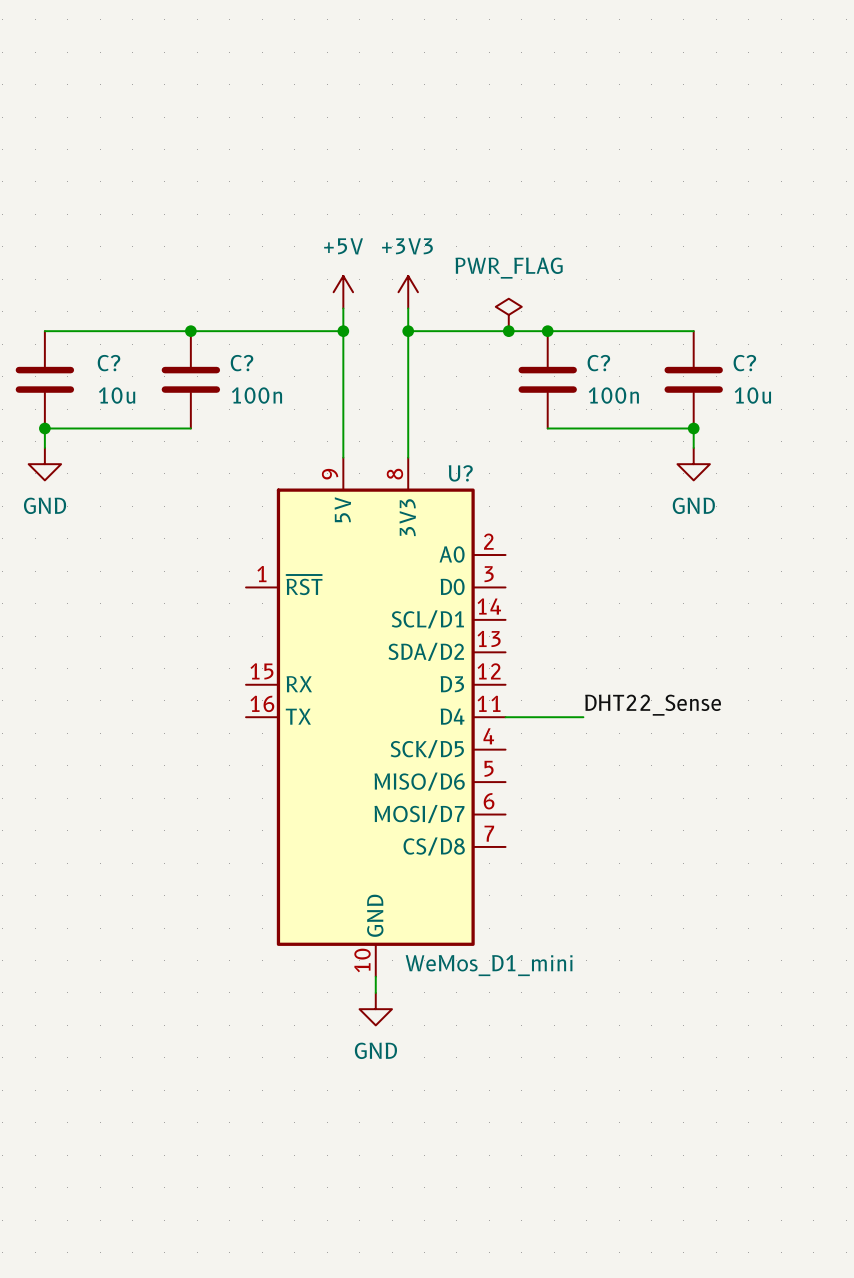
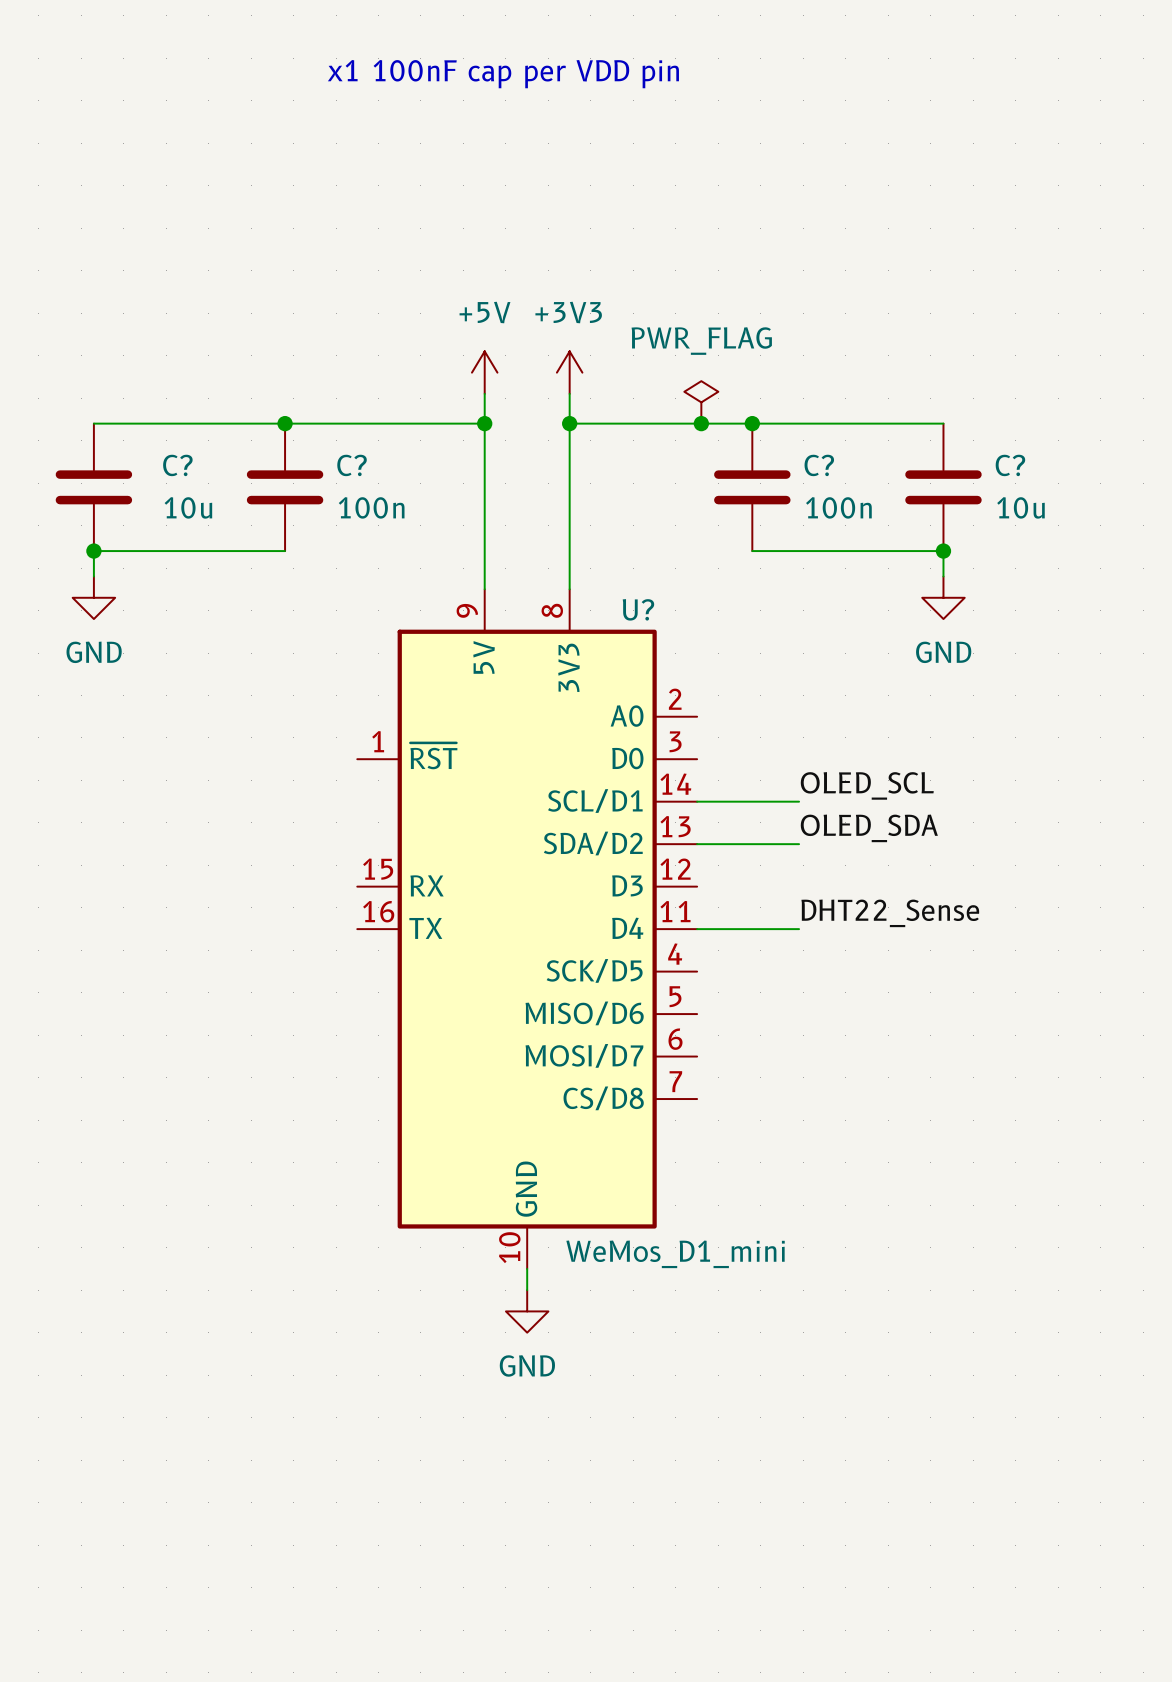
text: none -> x1 100nF cap per VDD pin (503, 74)
label: none -> OLED_SCL (867, 785)
wire: none -> (697, 801) (799, 801)
label: none -> OLED_SDA (869, 828)
wire: none -> (697, 844) (799, 844)

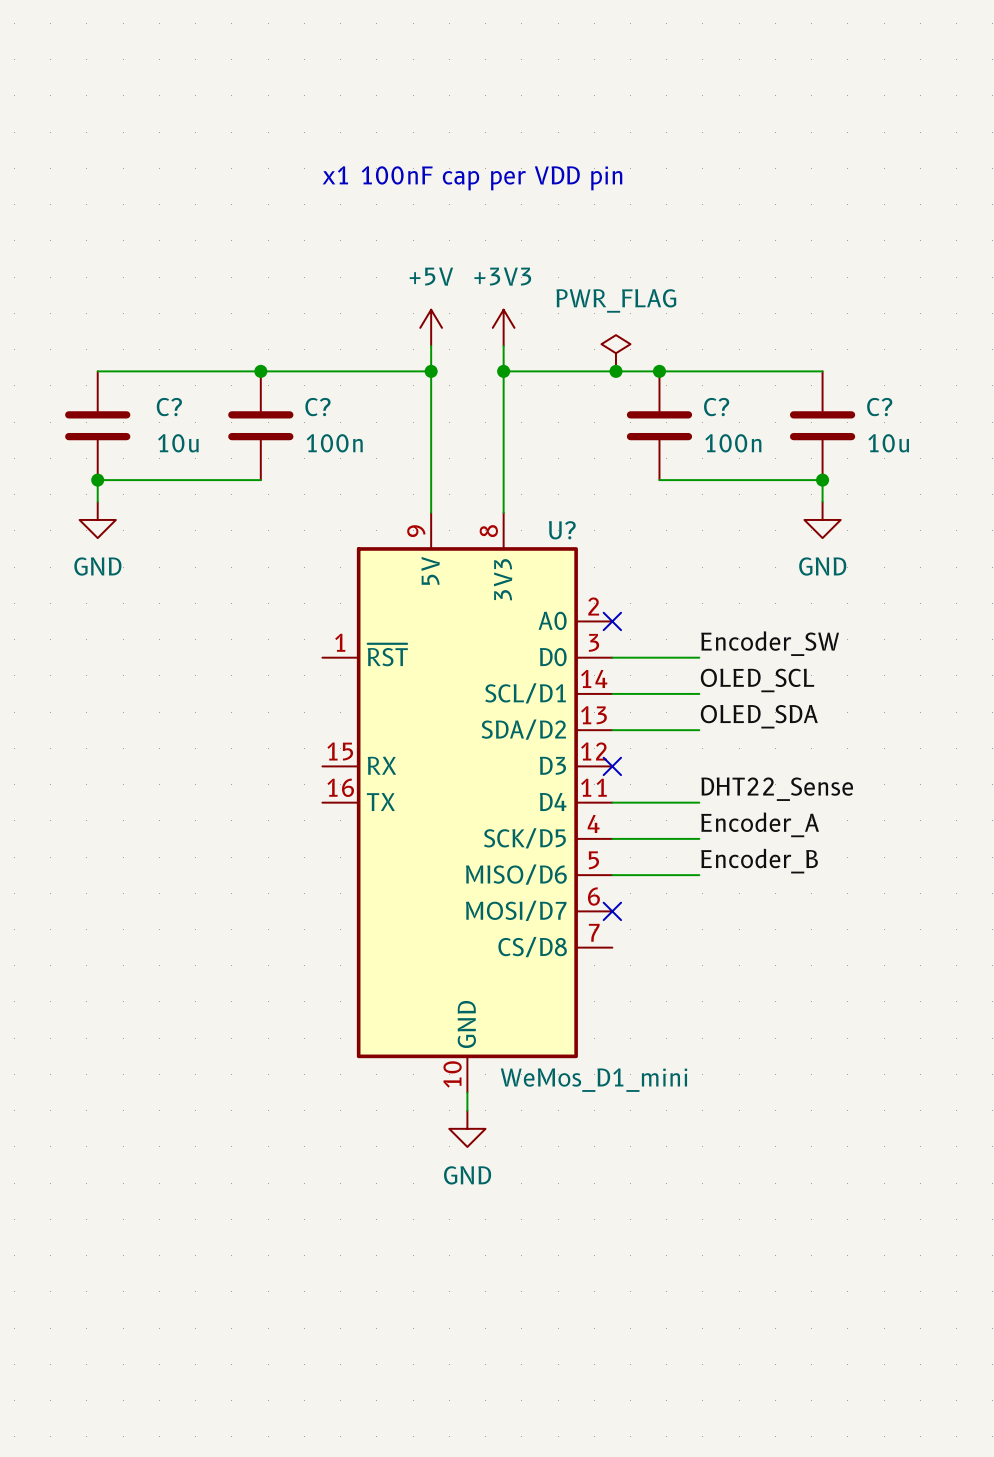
text position: x1 100nF cap per VDD pin (503, 74) -> x1 100nF cap per VDD pin (472, 178)
no-connect mark: none -> (612, 621)
label: none -> Encoder_SW (770, 643)
wire: none -> (612, 657) (699, 657)
no-connect mark: none -> (612, 766)
label: none -> Encoder_A (760, 824)
wire: none -> (612, 838) (699, 838)
label: none -> Encoder_B (759, 861)
wire: none -> (612, 875) (699, 875)
no-connect mark: none -> (612, 911)

